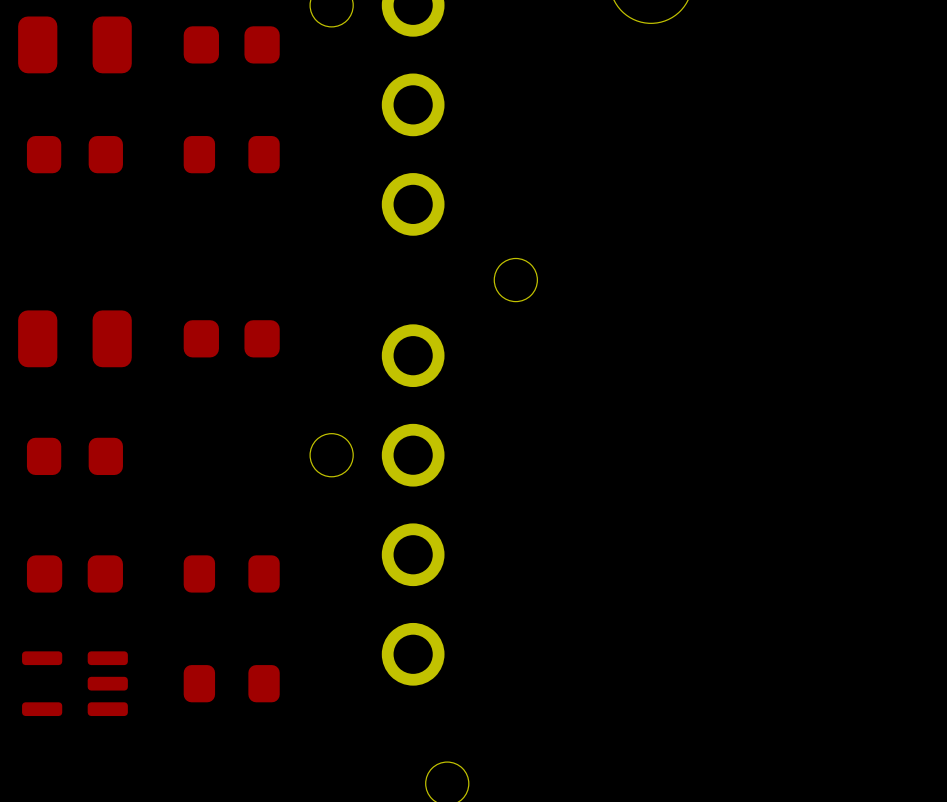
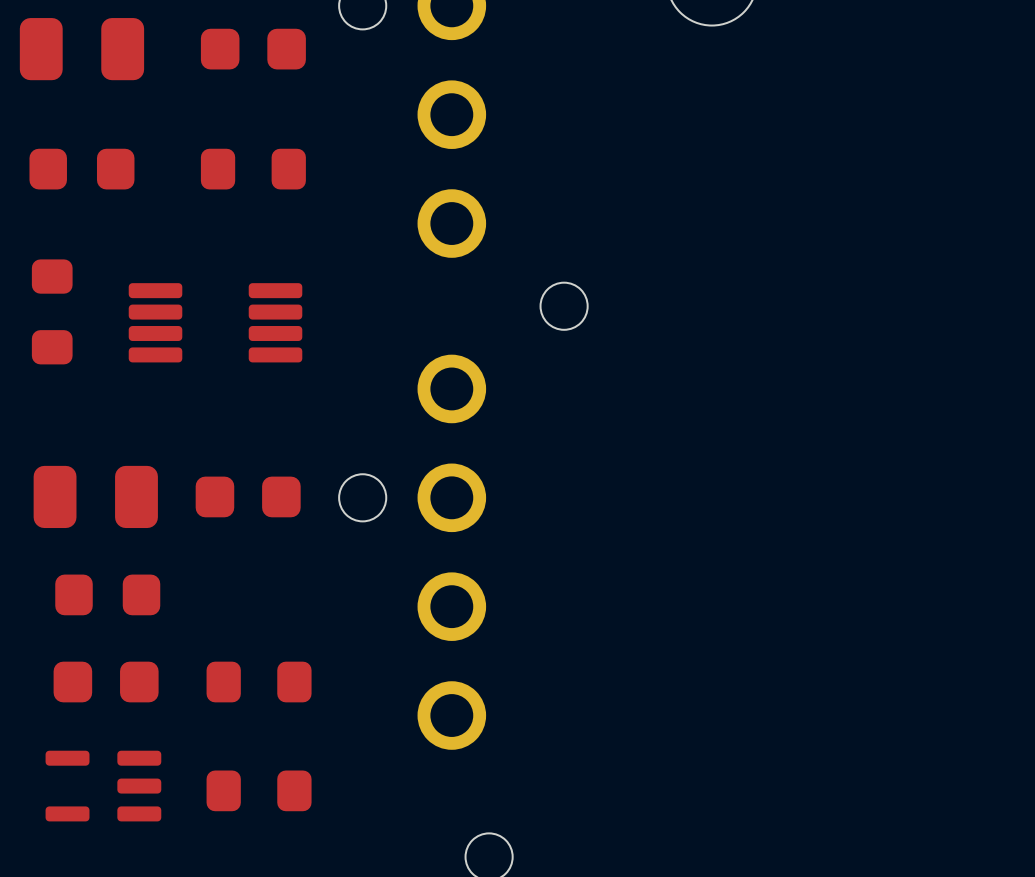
part: none -> (52, 311)
part: none -> (215, 322)
part: (74, 338) -> none
part: (231, 338) -> none
part footprint: [26, 437, 123, 476] -> [33, 465, 158, 529]
part: none -> (248, 496)
part: none -> (107, 594)
part position: (74, 573) -> (106, 682)
part: (231, 573) -> none
part: none -> (259, 682)
part position: (74, 683) -> (103, 786)
part: (231, 683) -> none
part: none -> (259, 790)

